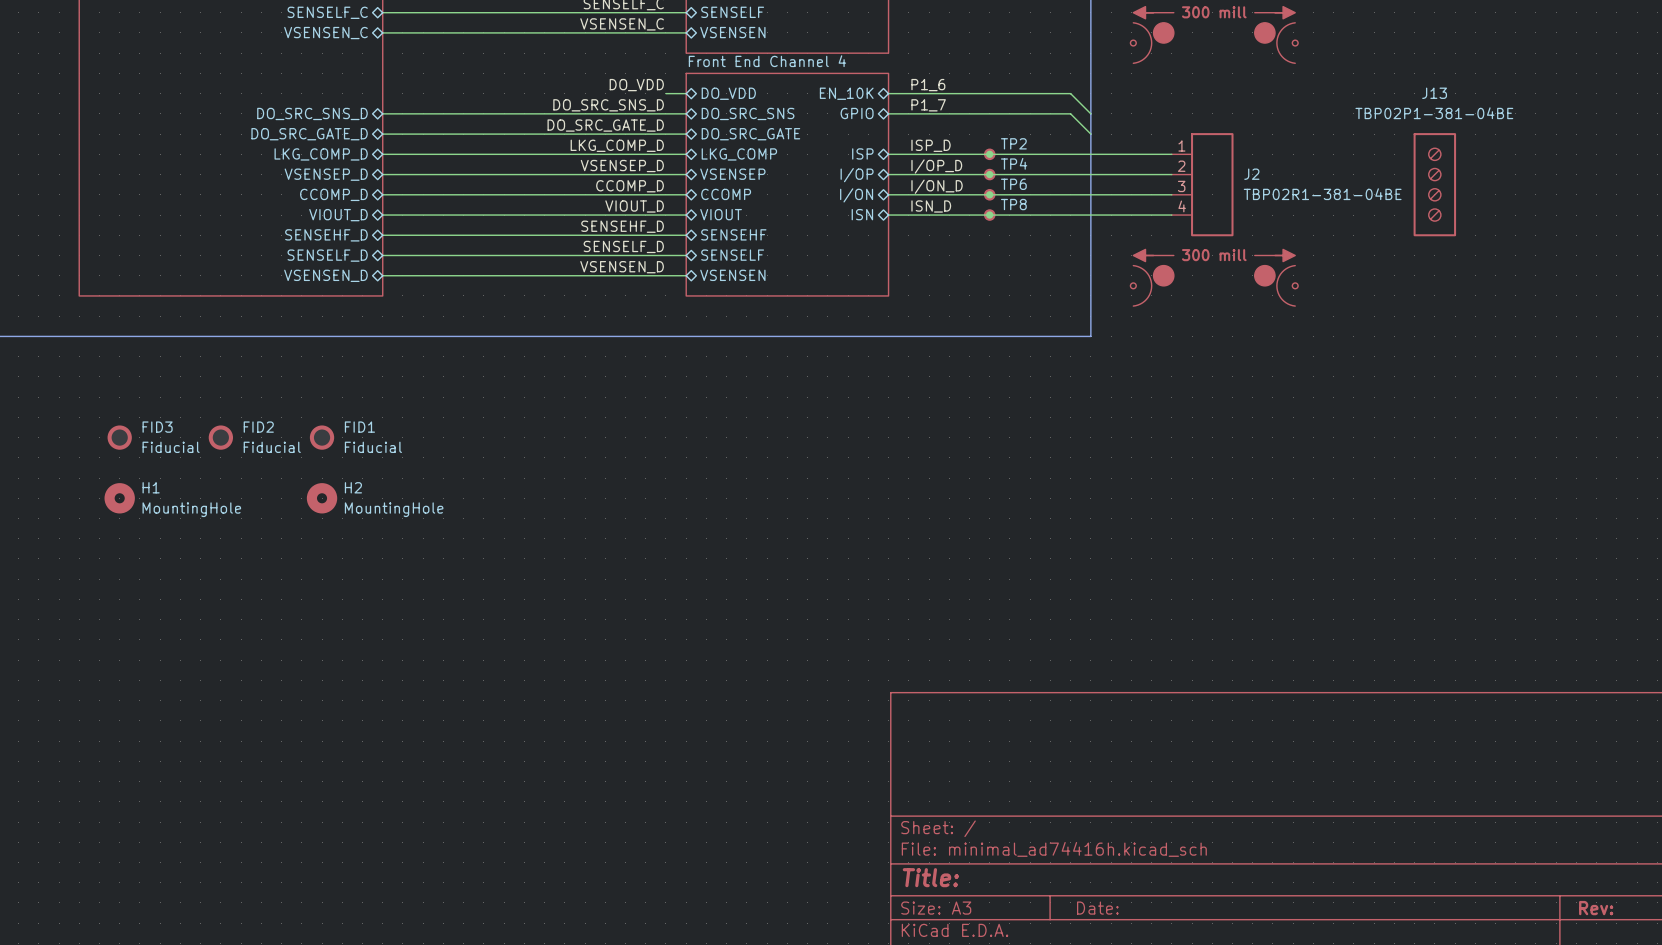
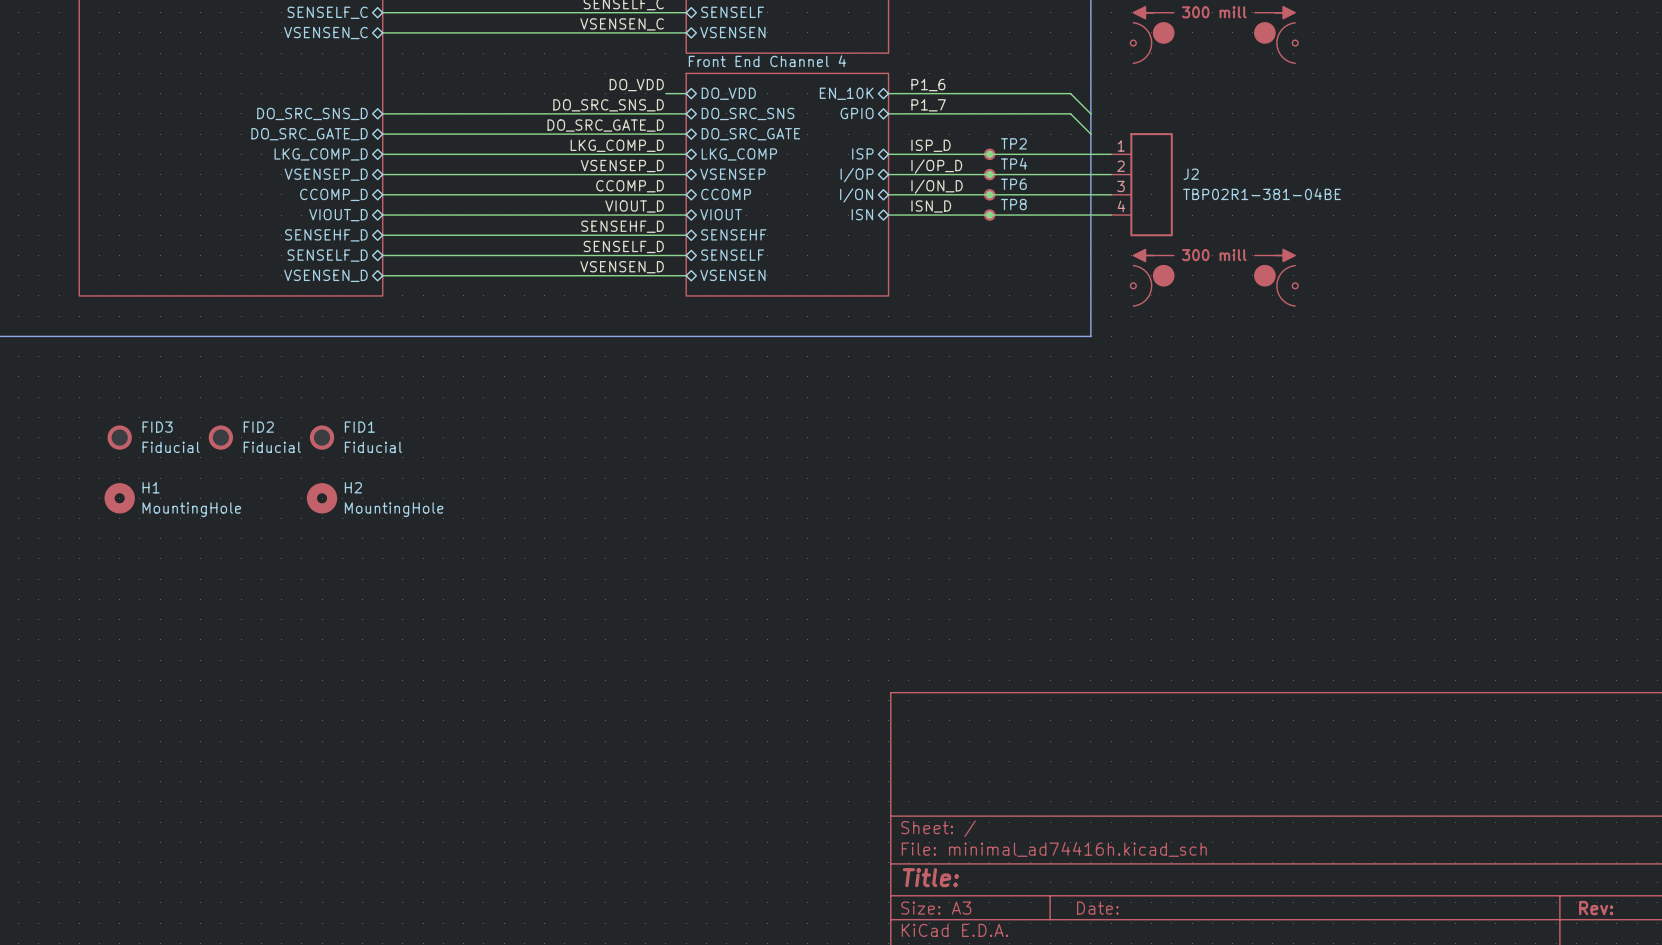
wire: (1111, 154) (1171, 154) -> none
wire: (1111, 174) (1171, 174) -> none
J2 position: (1202, 184) -> (1141, 184)
J13: TBP02P1-381-04BE (1434, 184) -> none
wire: (1111, 194) (1171, 194) -> none
wire: (1111, 215) (1171, 215) -> none

